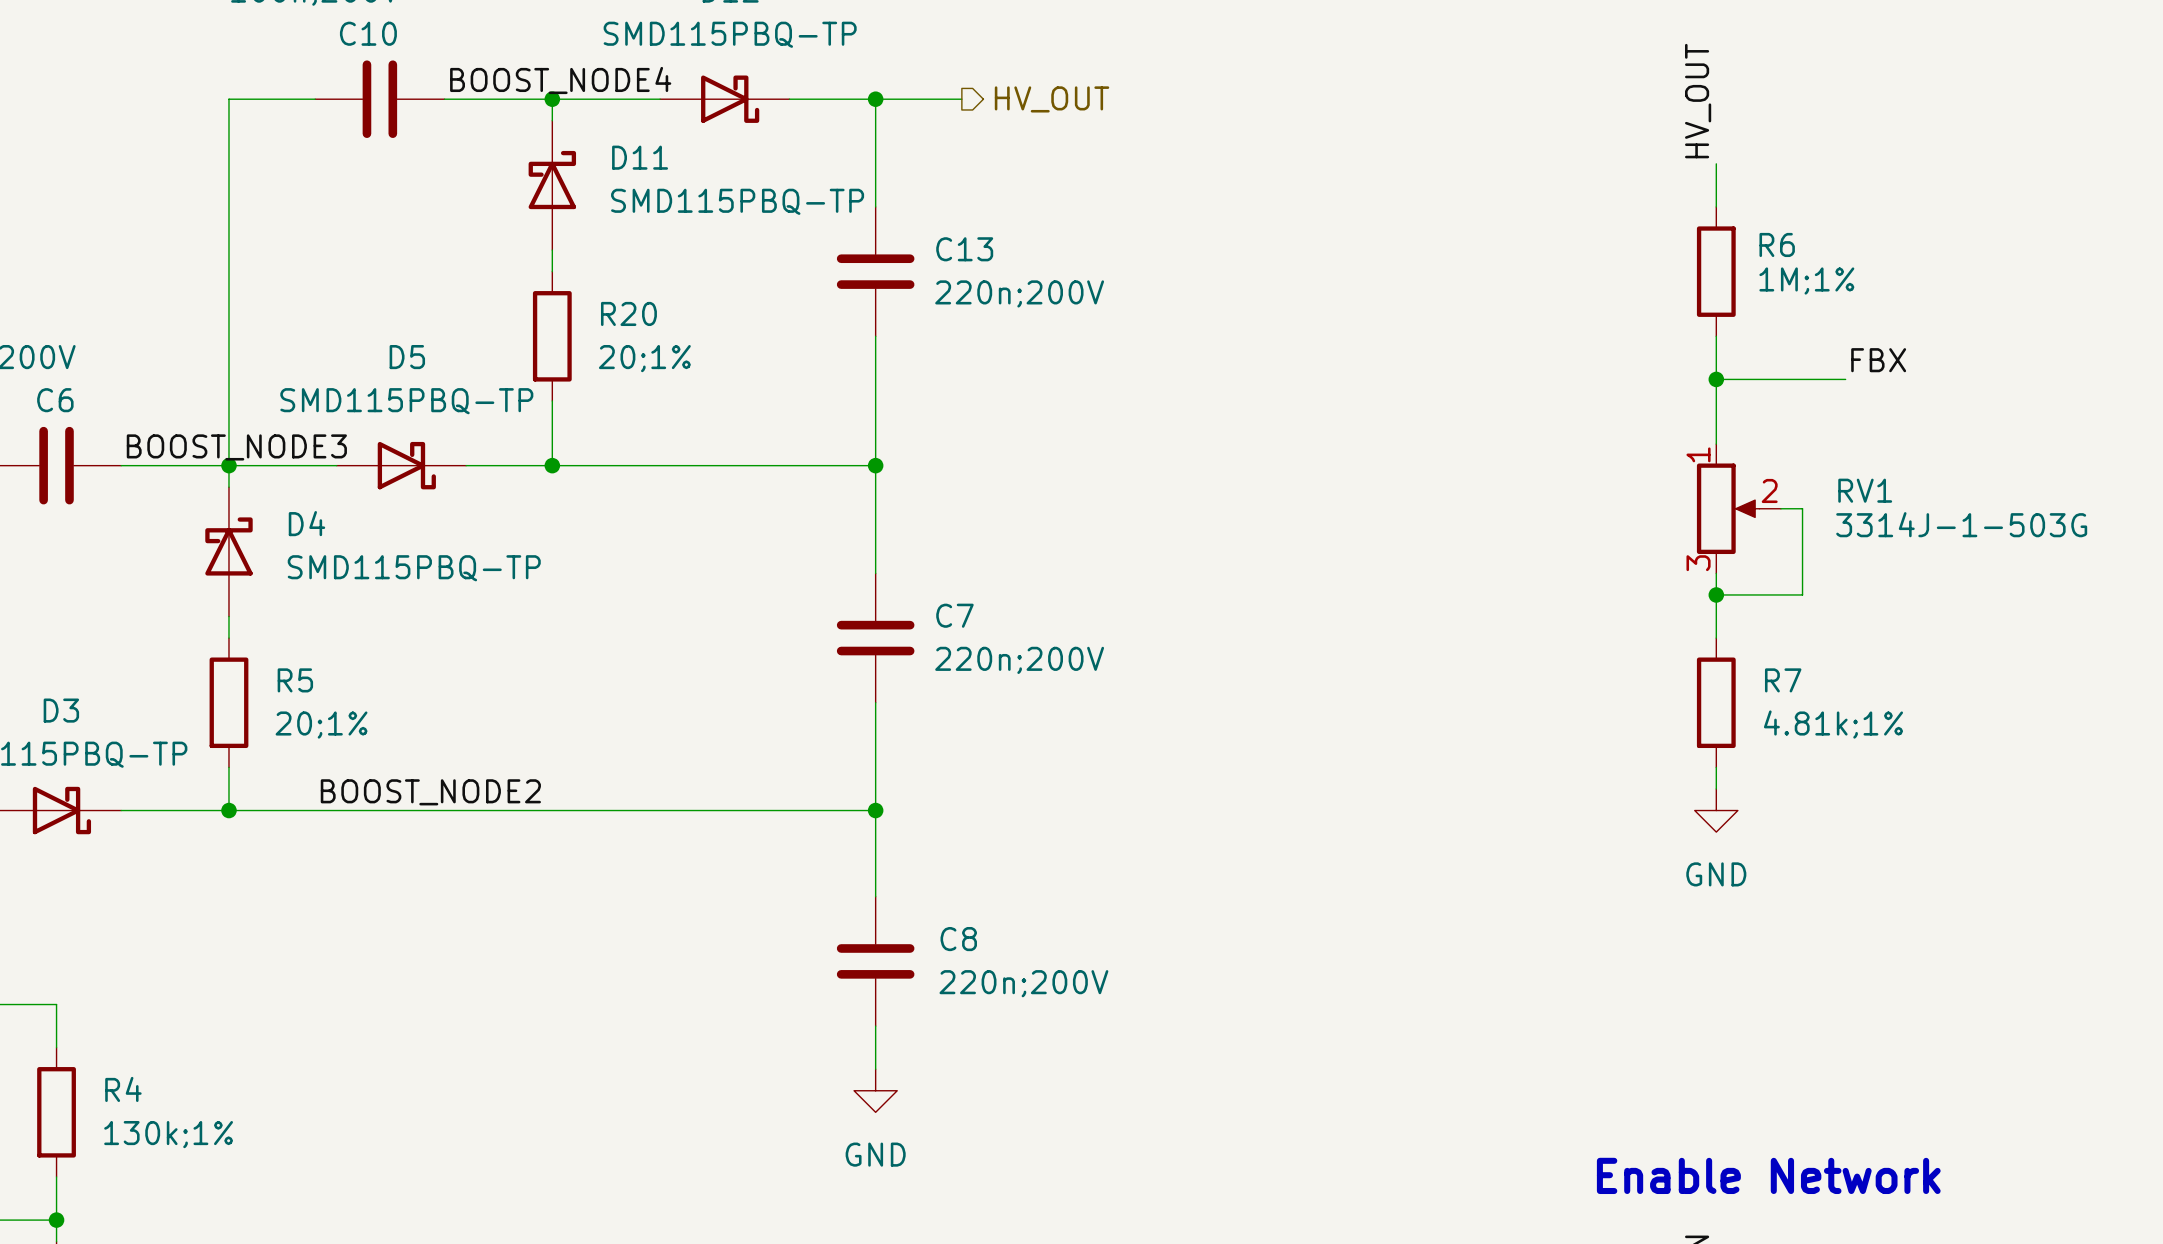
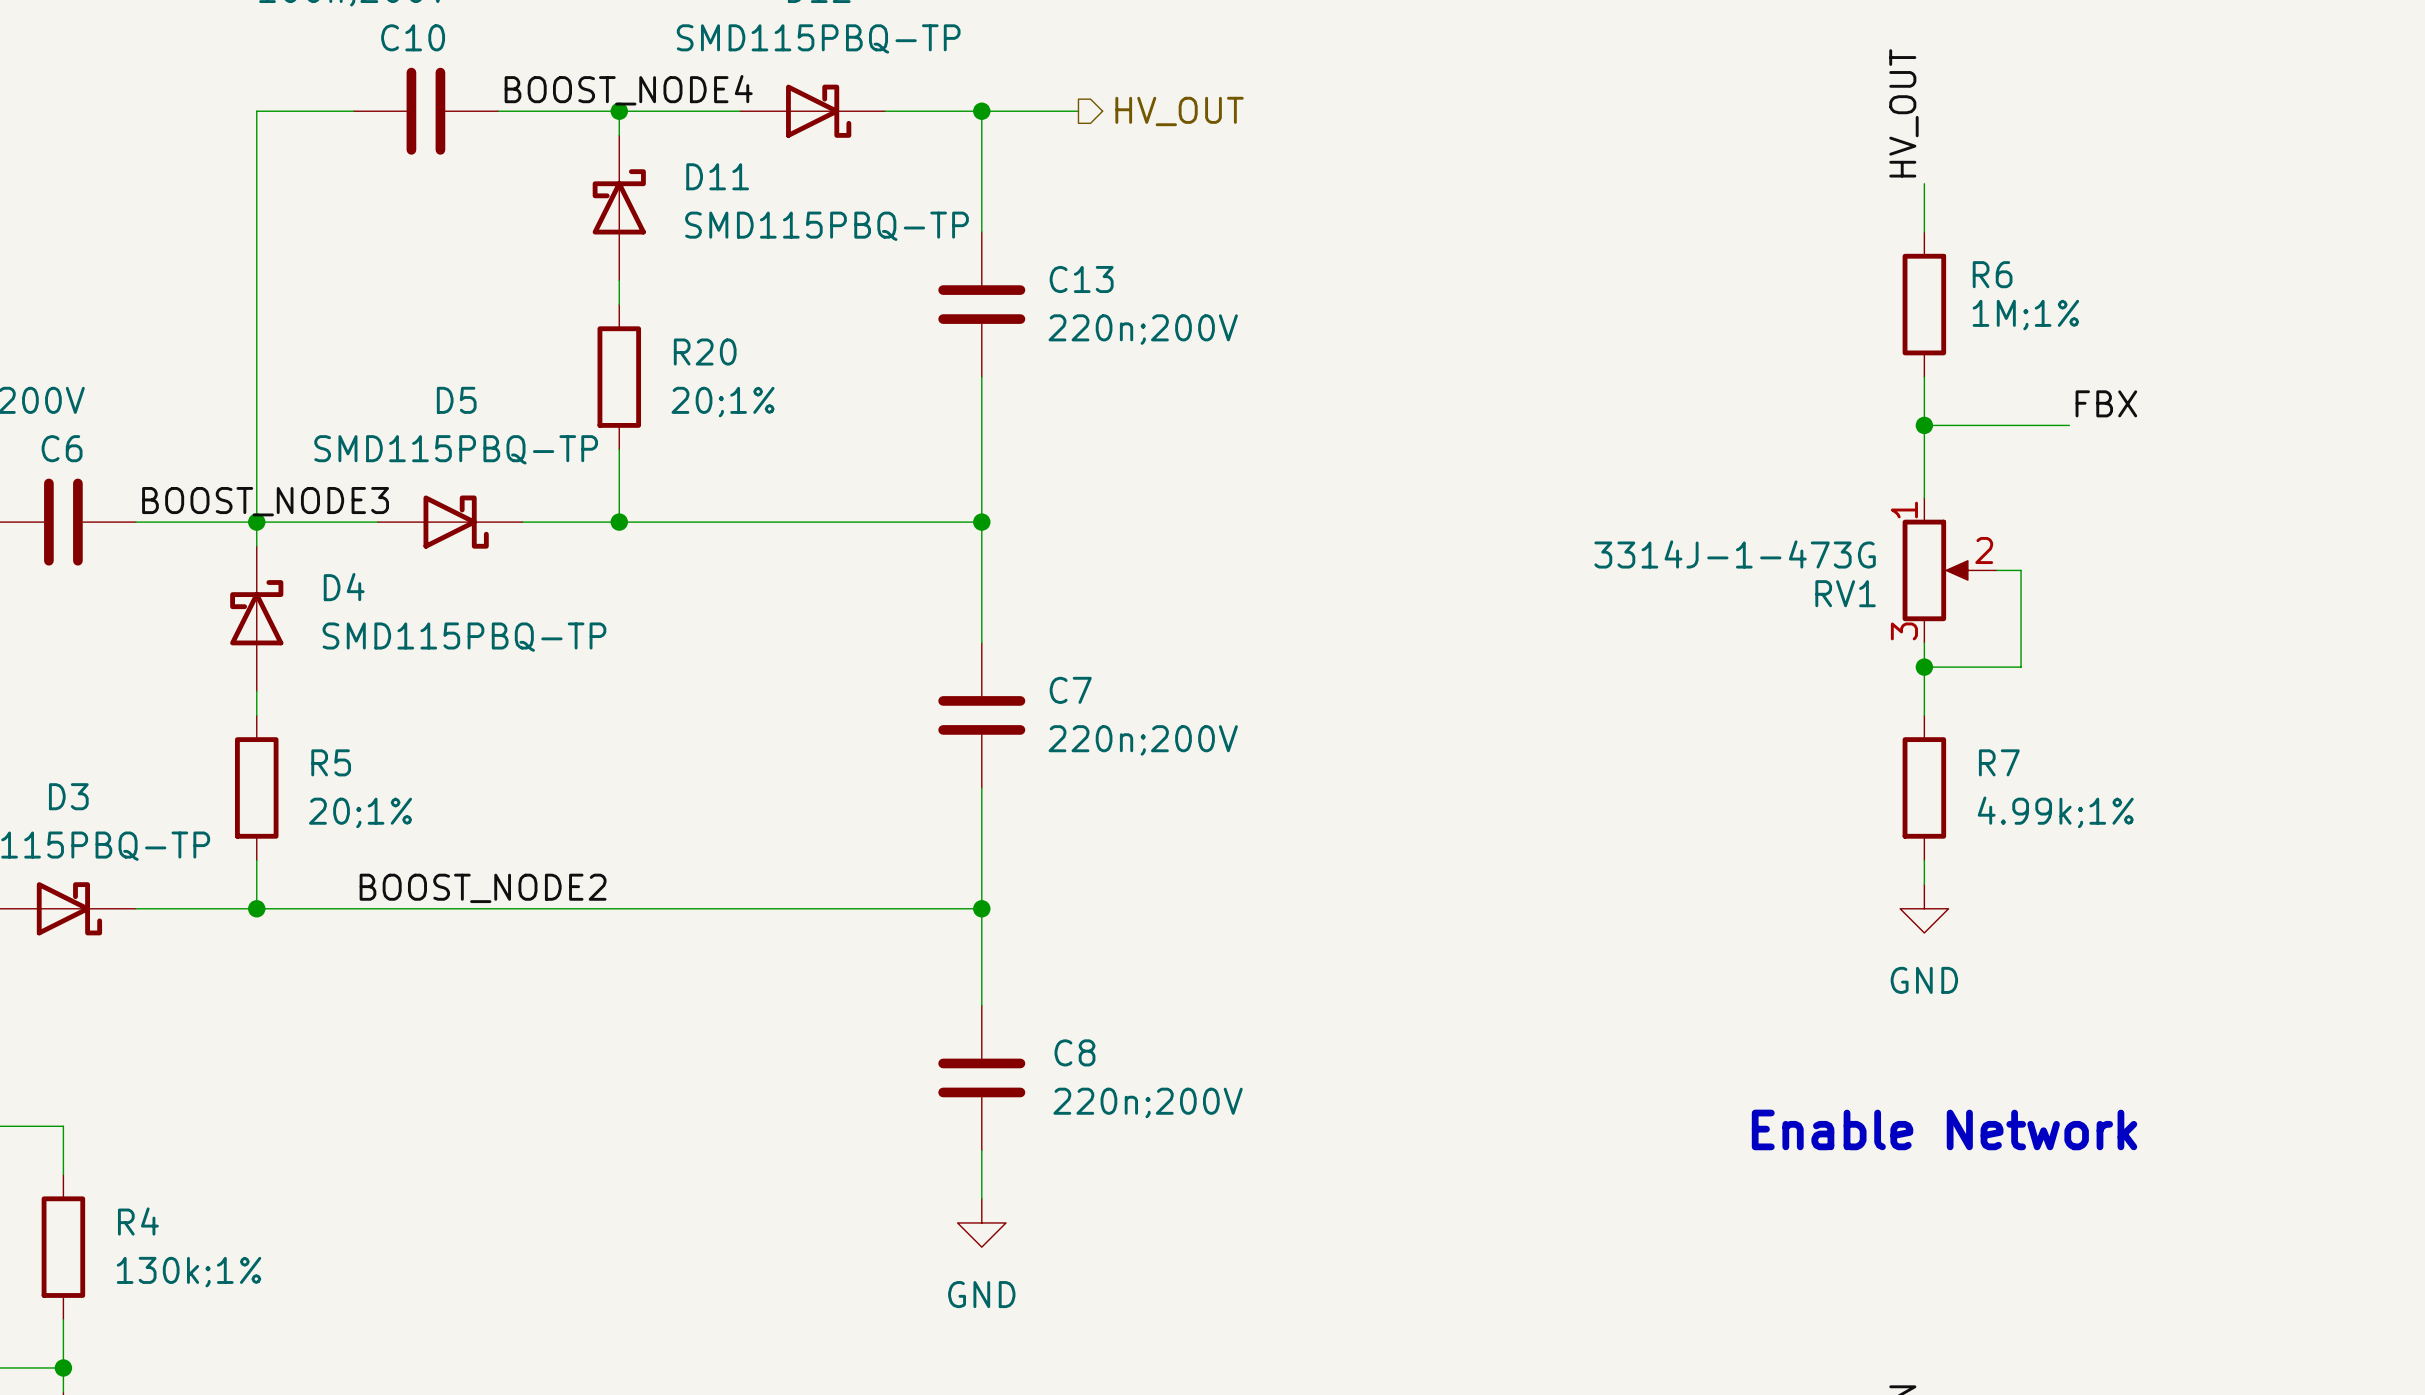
RV1 name position: RV1 (1865, 490) -> RV1 (1845, 593)
RV1 value: 3314J-1-503G (1961, 524) -> 3314J-1-473G (1735, 554)
R7 value: 4.81k;1% (1833, 724) -> 4.99k;1% (2055, 812)
text position: Enable Network (1768, 1175) -> Enable Network (1944, 1129)

